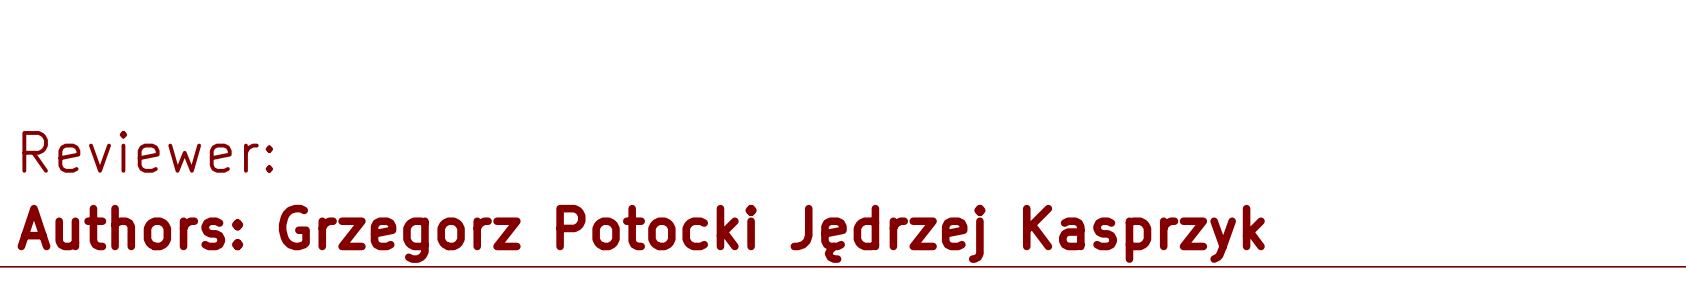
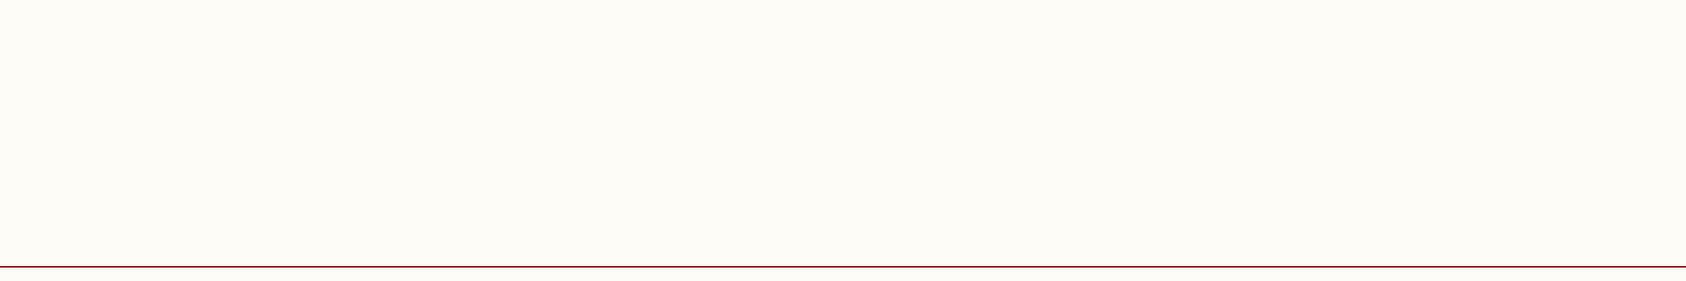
title block: Reviewer: (147, 151) -> none
title block: Authors: Grzegorz Potocki Jędrzej Kasprzyk (641, 233) -> none

